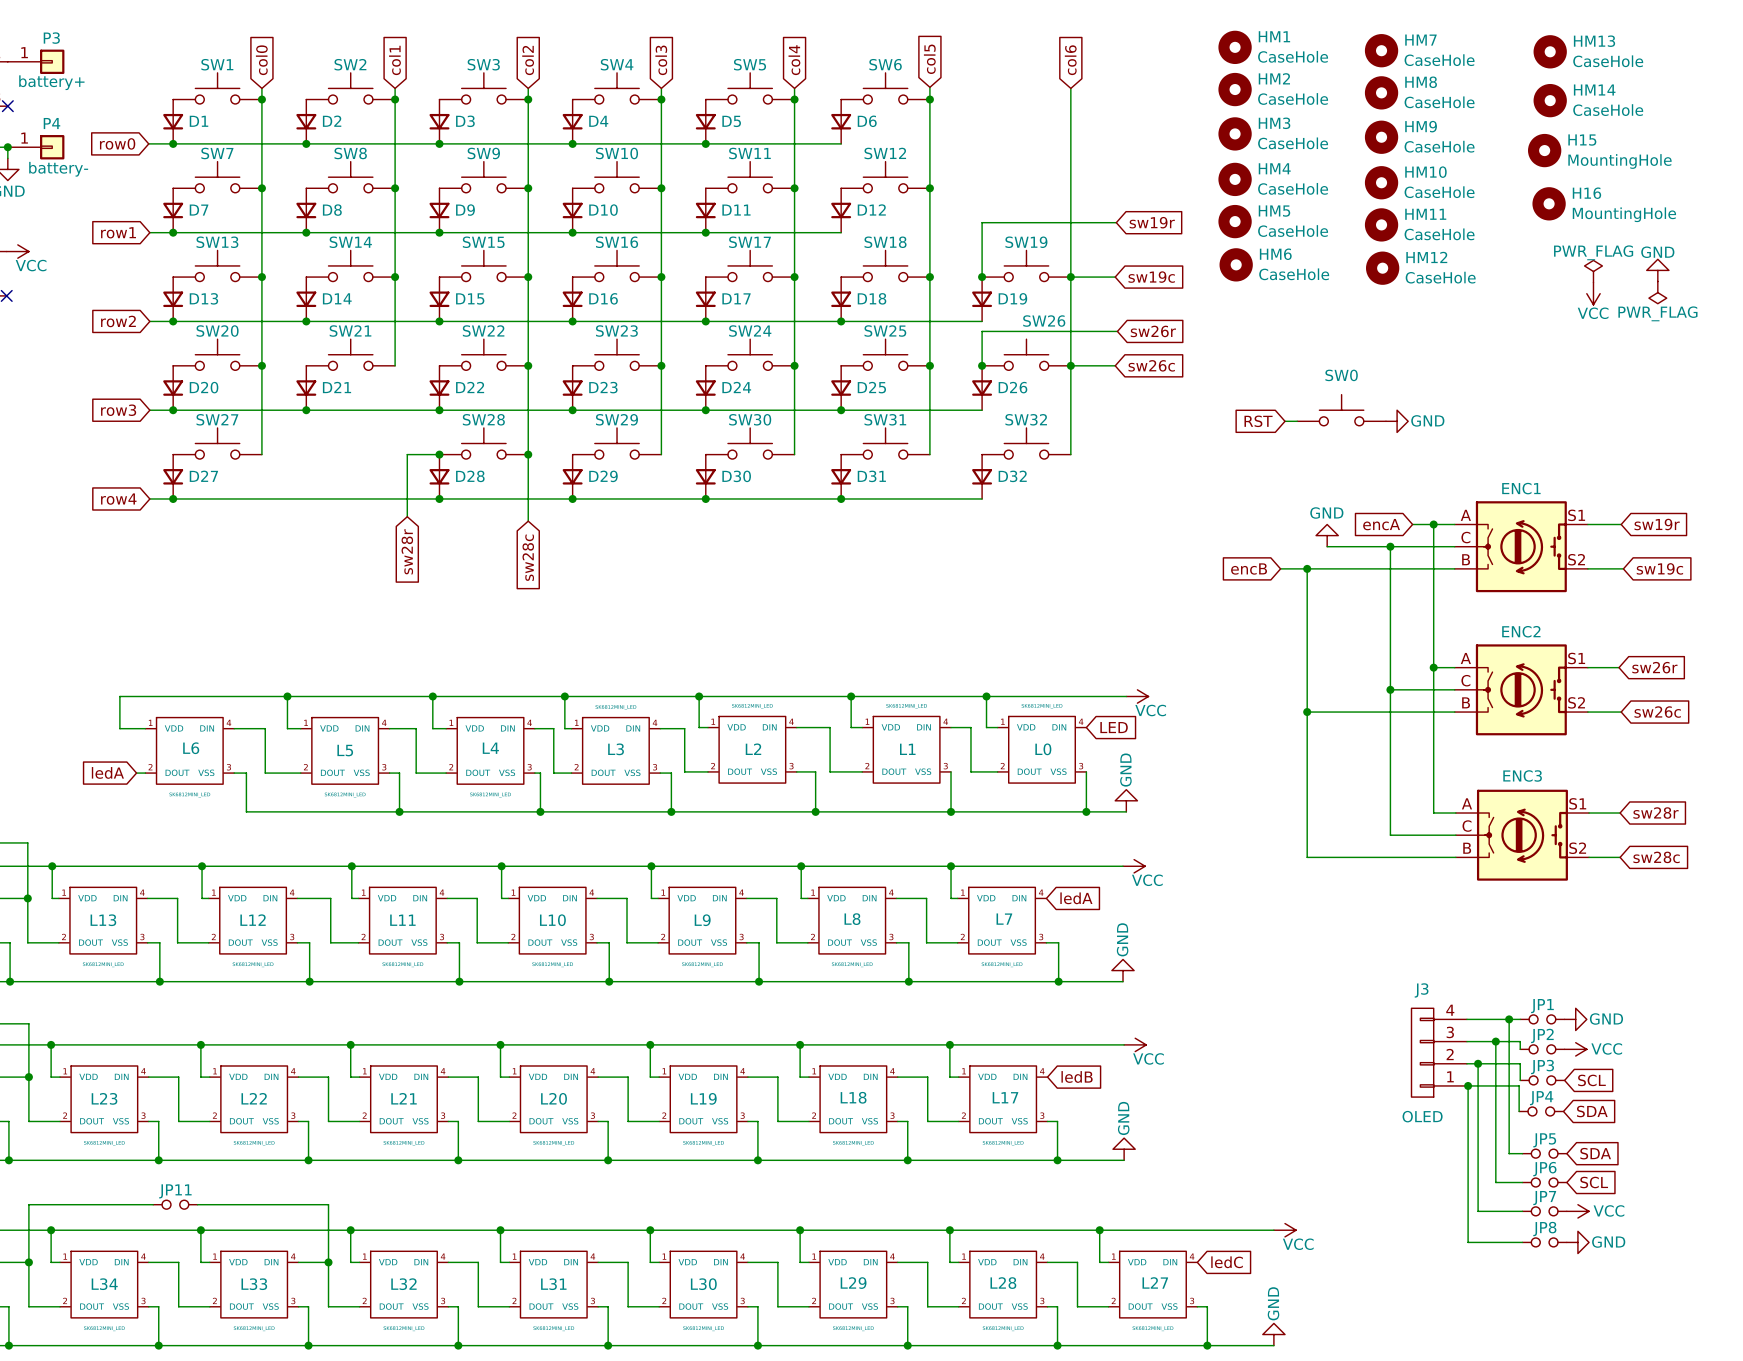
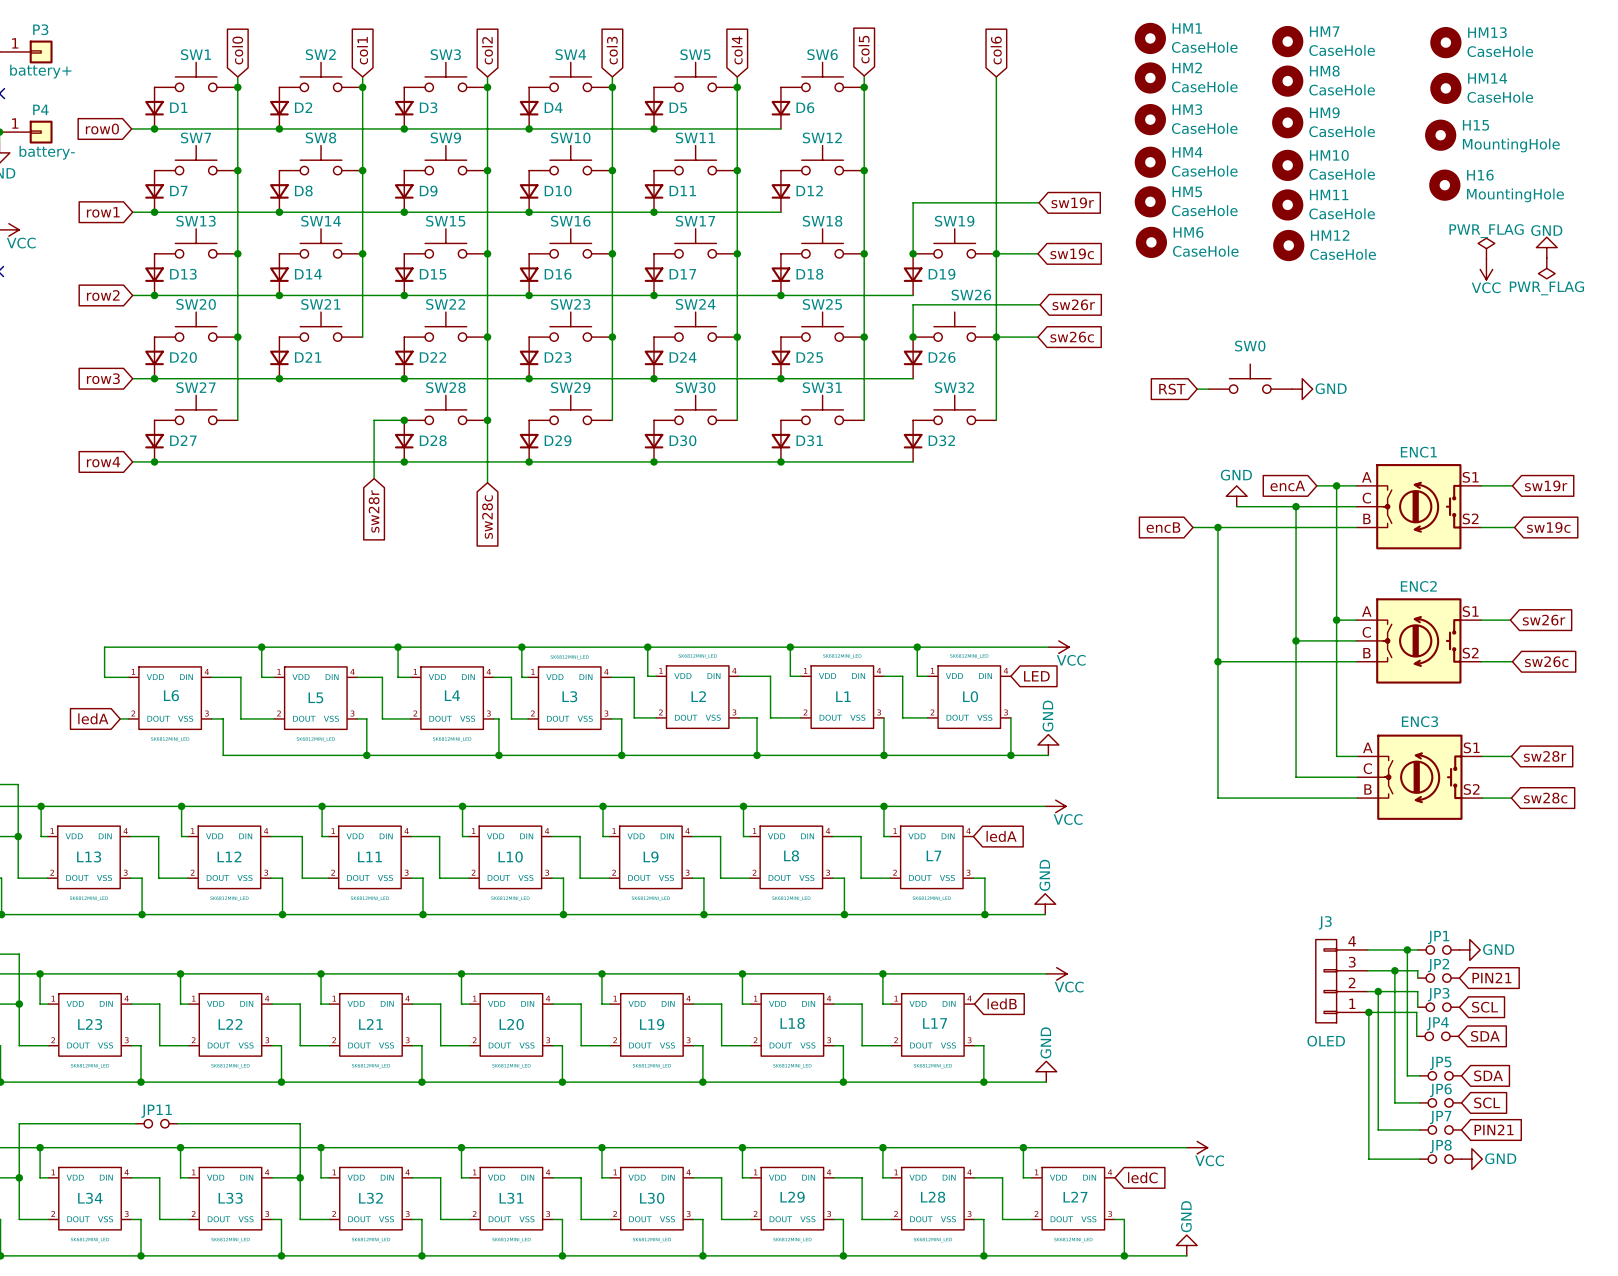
power symbol: VCC (1575, 1049) -> none
global label: none -> PIN21 (1491, 977)
power symbol: VCC (1577, 1211) -> none
global label: none -> PIN21 (1494, 1129)

